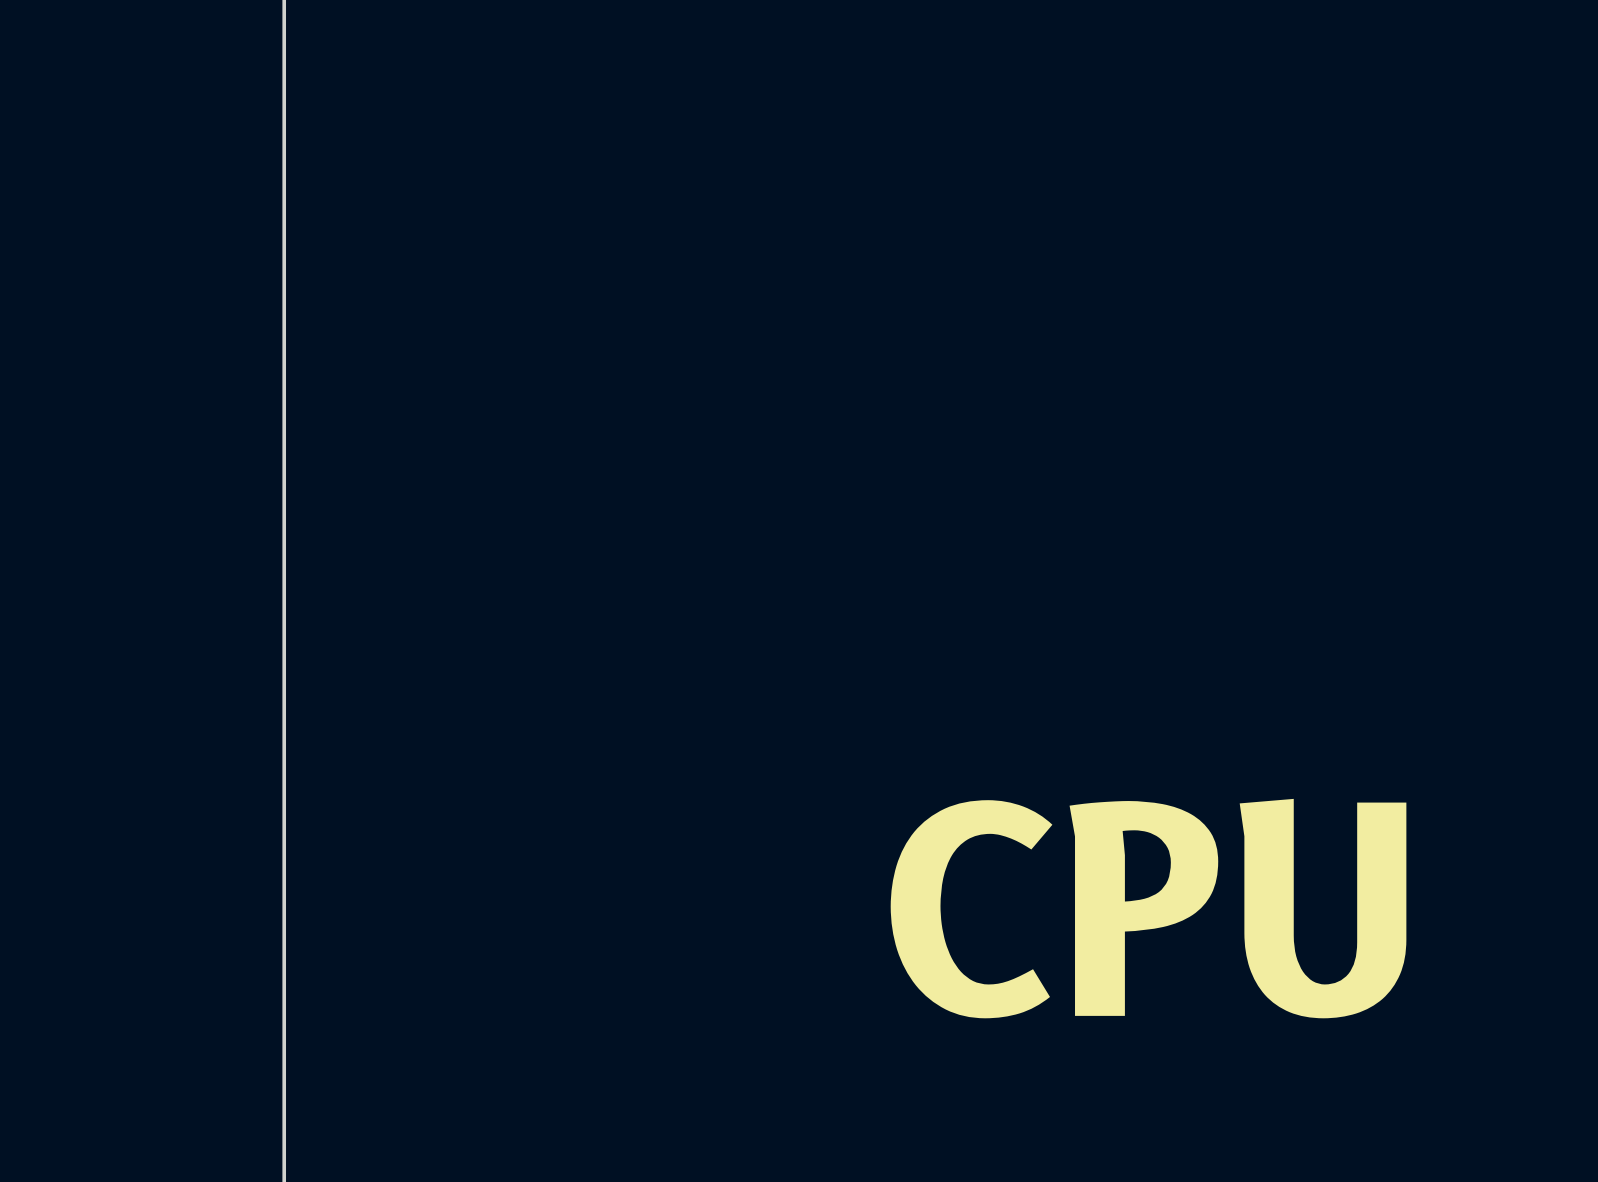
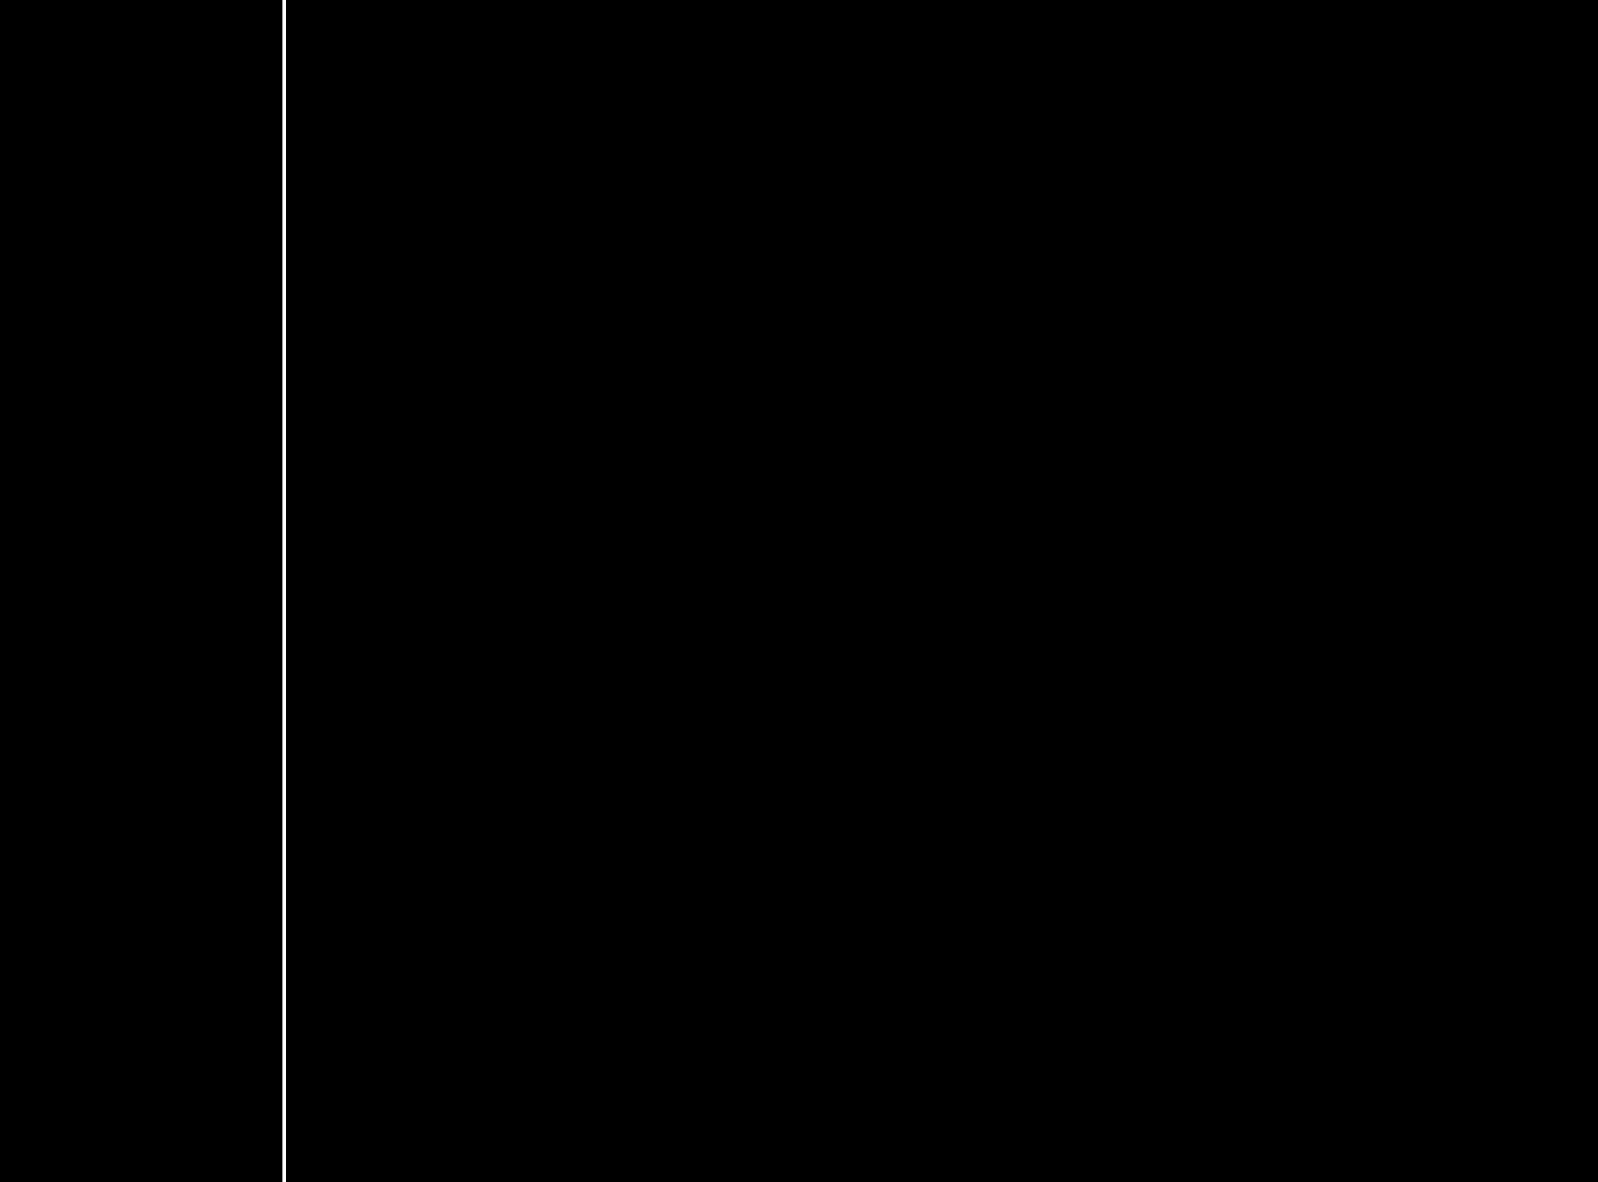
text: CPU (1148, 908) -> none

